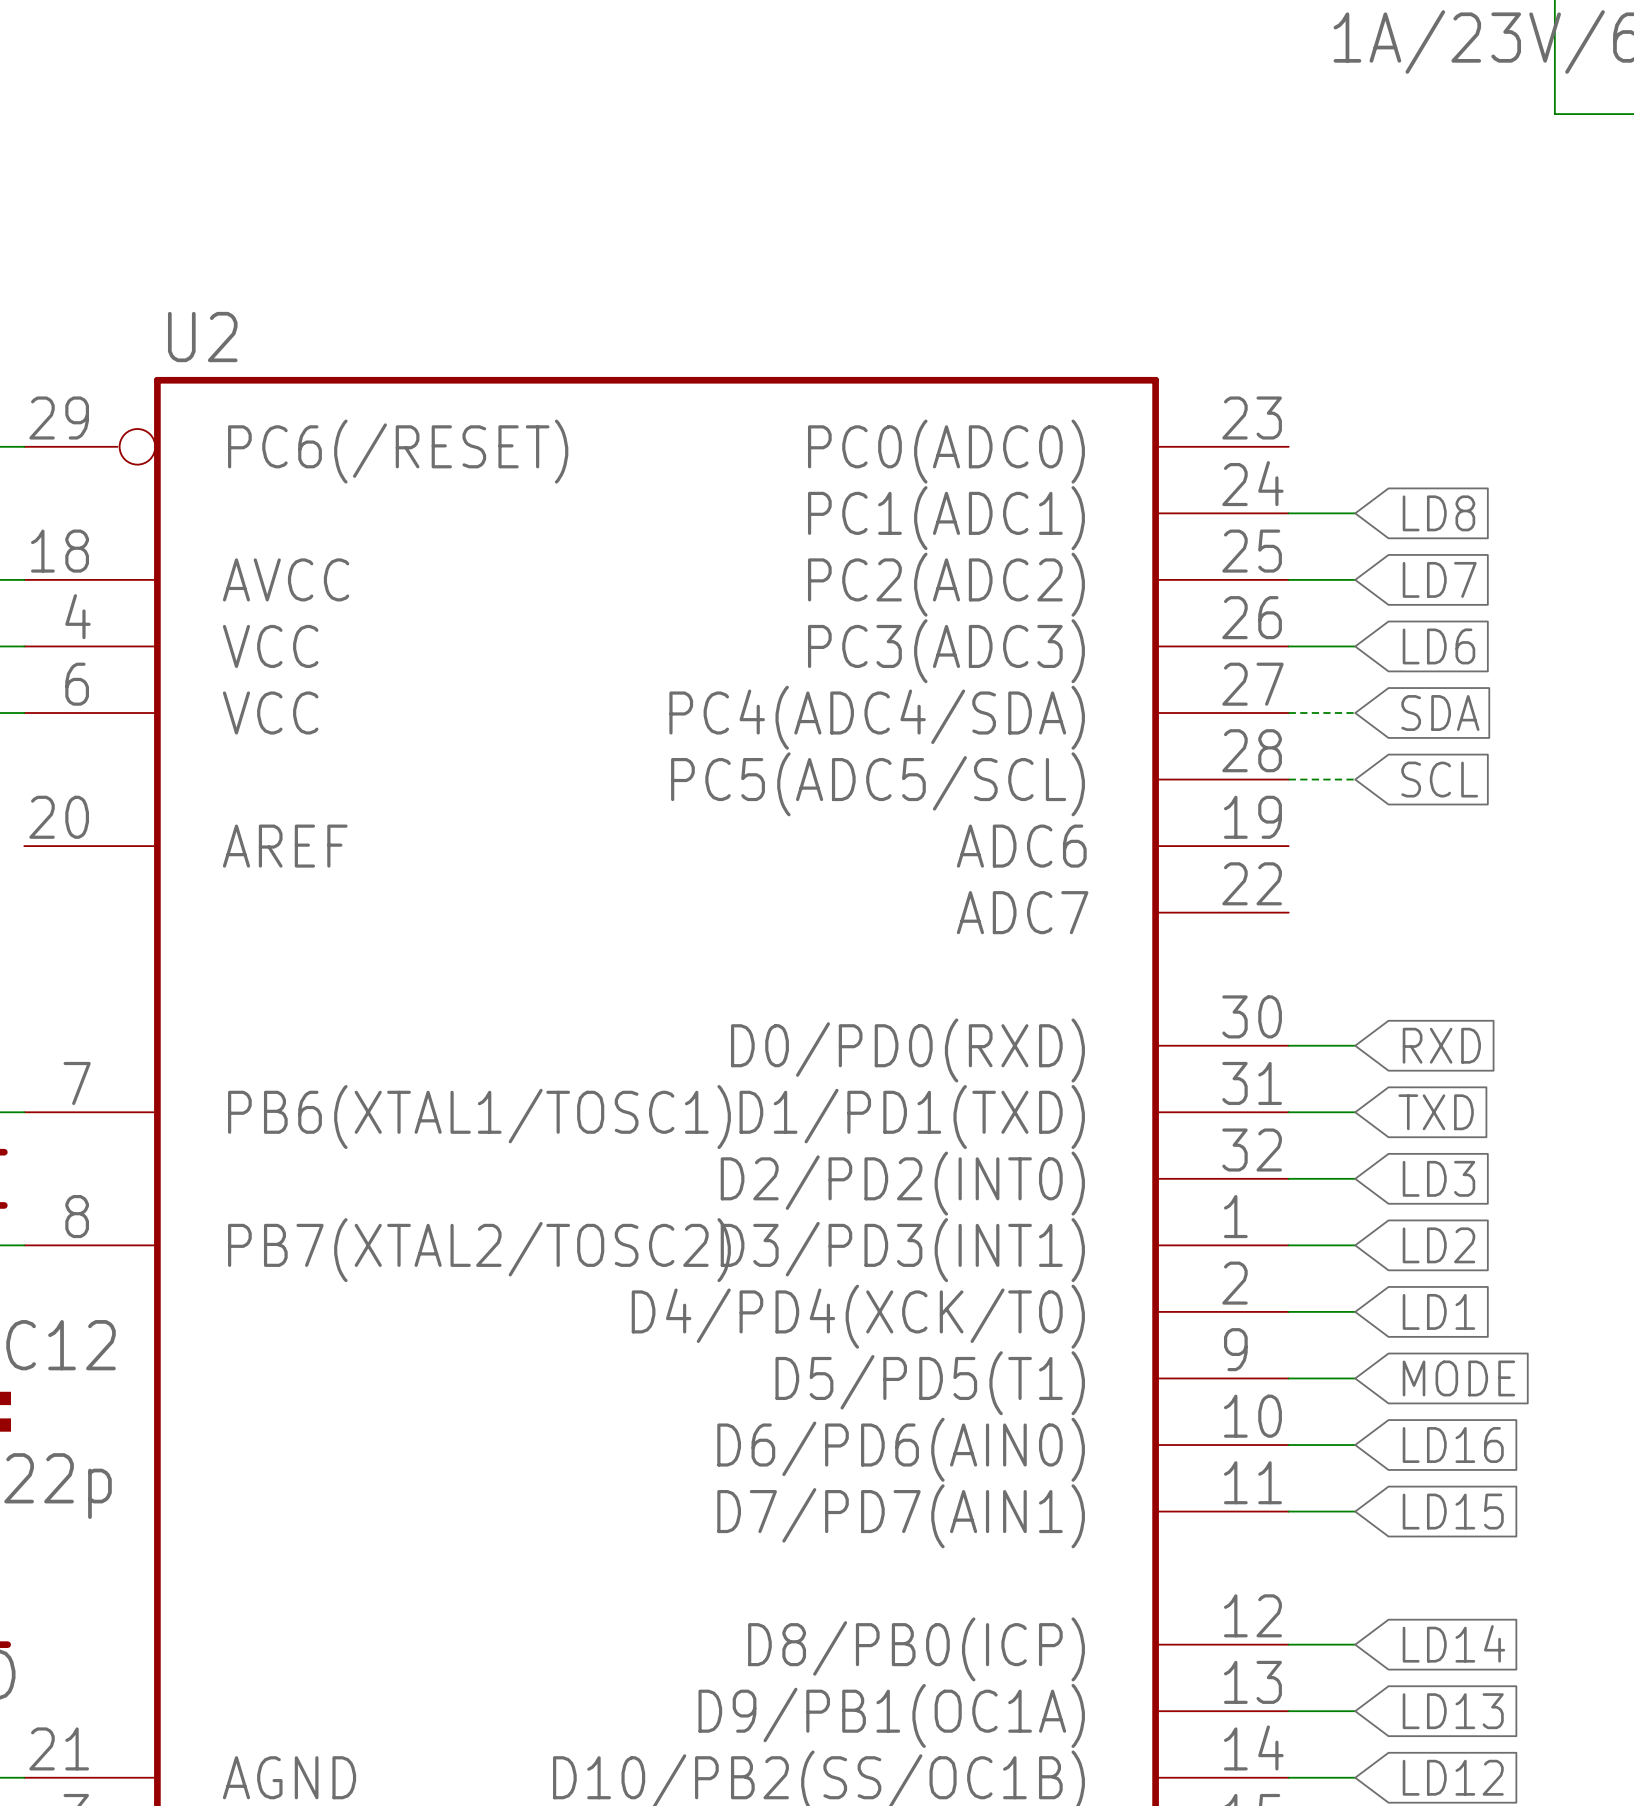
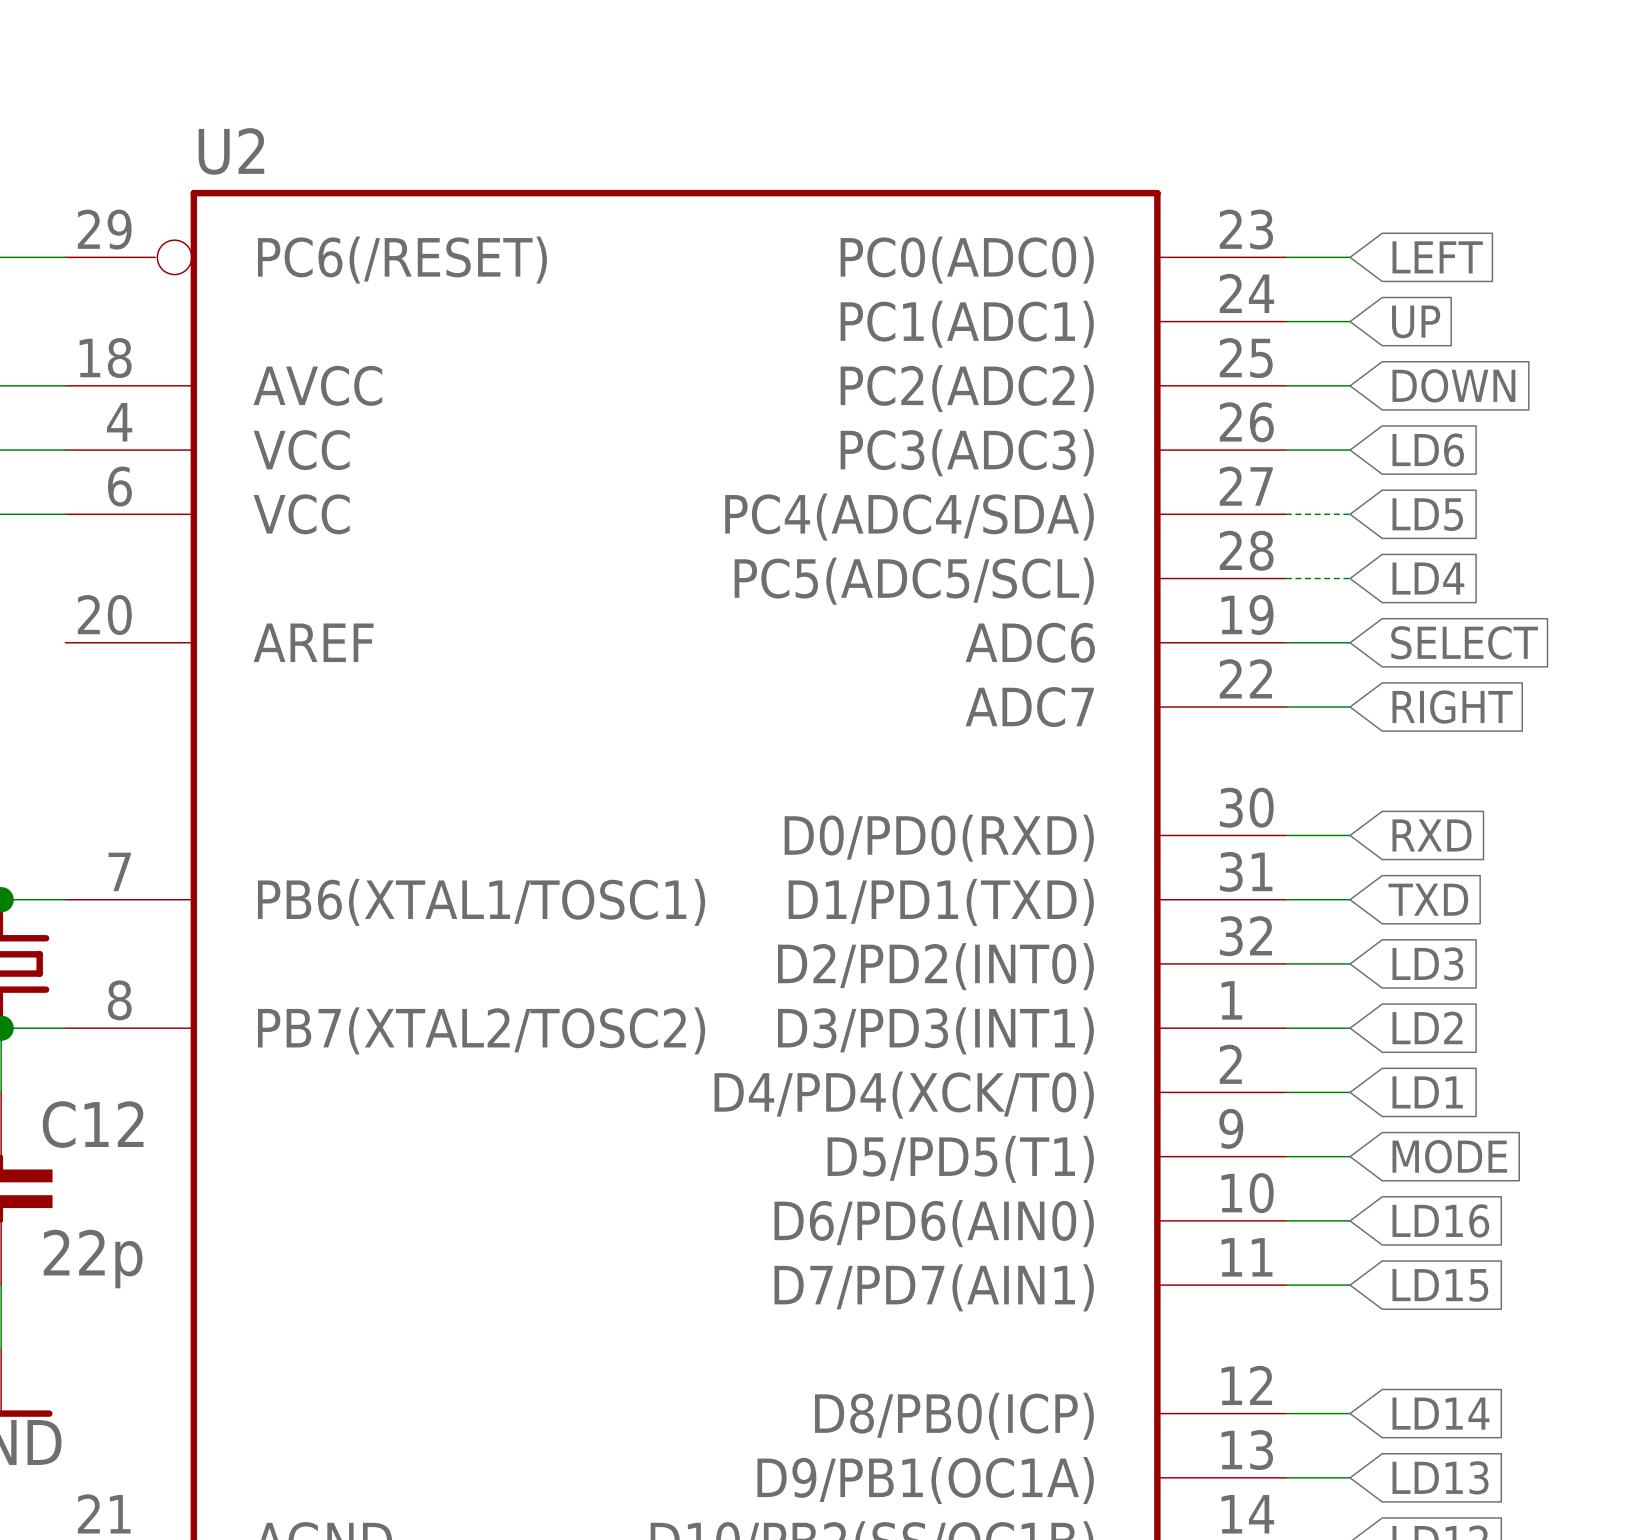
wire: none -> (1285, 257) (1350, 257)
global label: none -> LEFT (1437, 257)
global label: LD8 (1438, 513) -> UP (1416, 321)
global label: LD7 (1439, 579) -> DOWN (1453, 385)
global label: SDA (1440, 713) -> LD5 (1427, 514)
global label: SCL (1439, 779) -> LD4 (1428, 578)
wire: none -> (1285, 642) (1350, 642)
global label: none -> SELECT (1464, 642)
wire: none -> (1285, 707) (1350, 707)
global label: none -> RIGHT (1452, 707)

